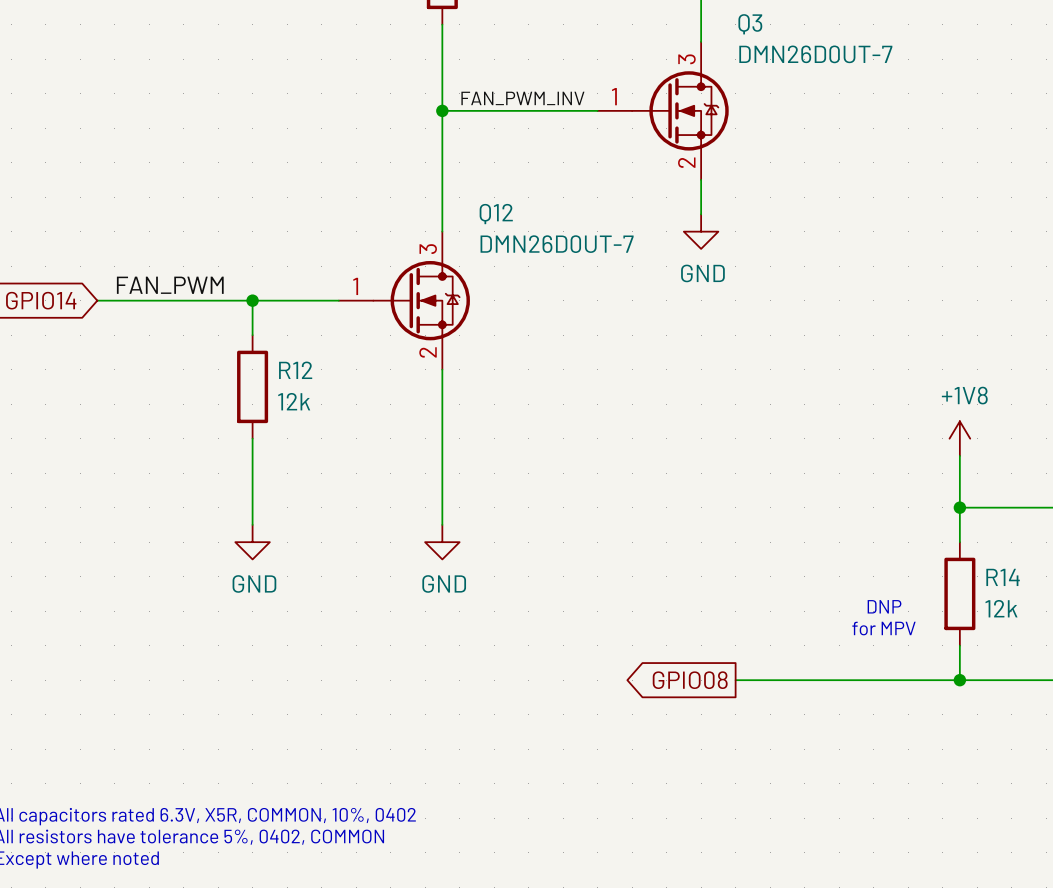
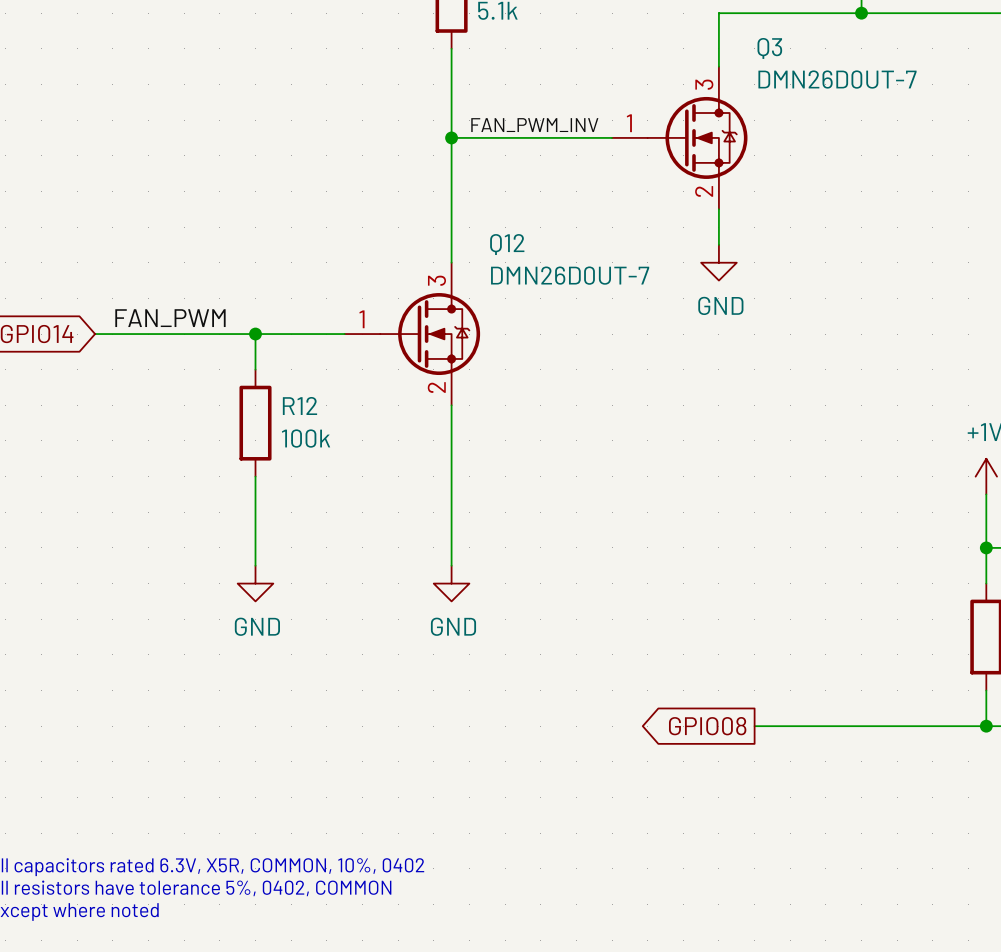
R12 value: 12k (294, 401) -> 100k (306, 438)
text: DNP (884, 606) -> none
text: for MPV (883, 628) -> none

